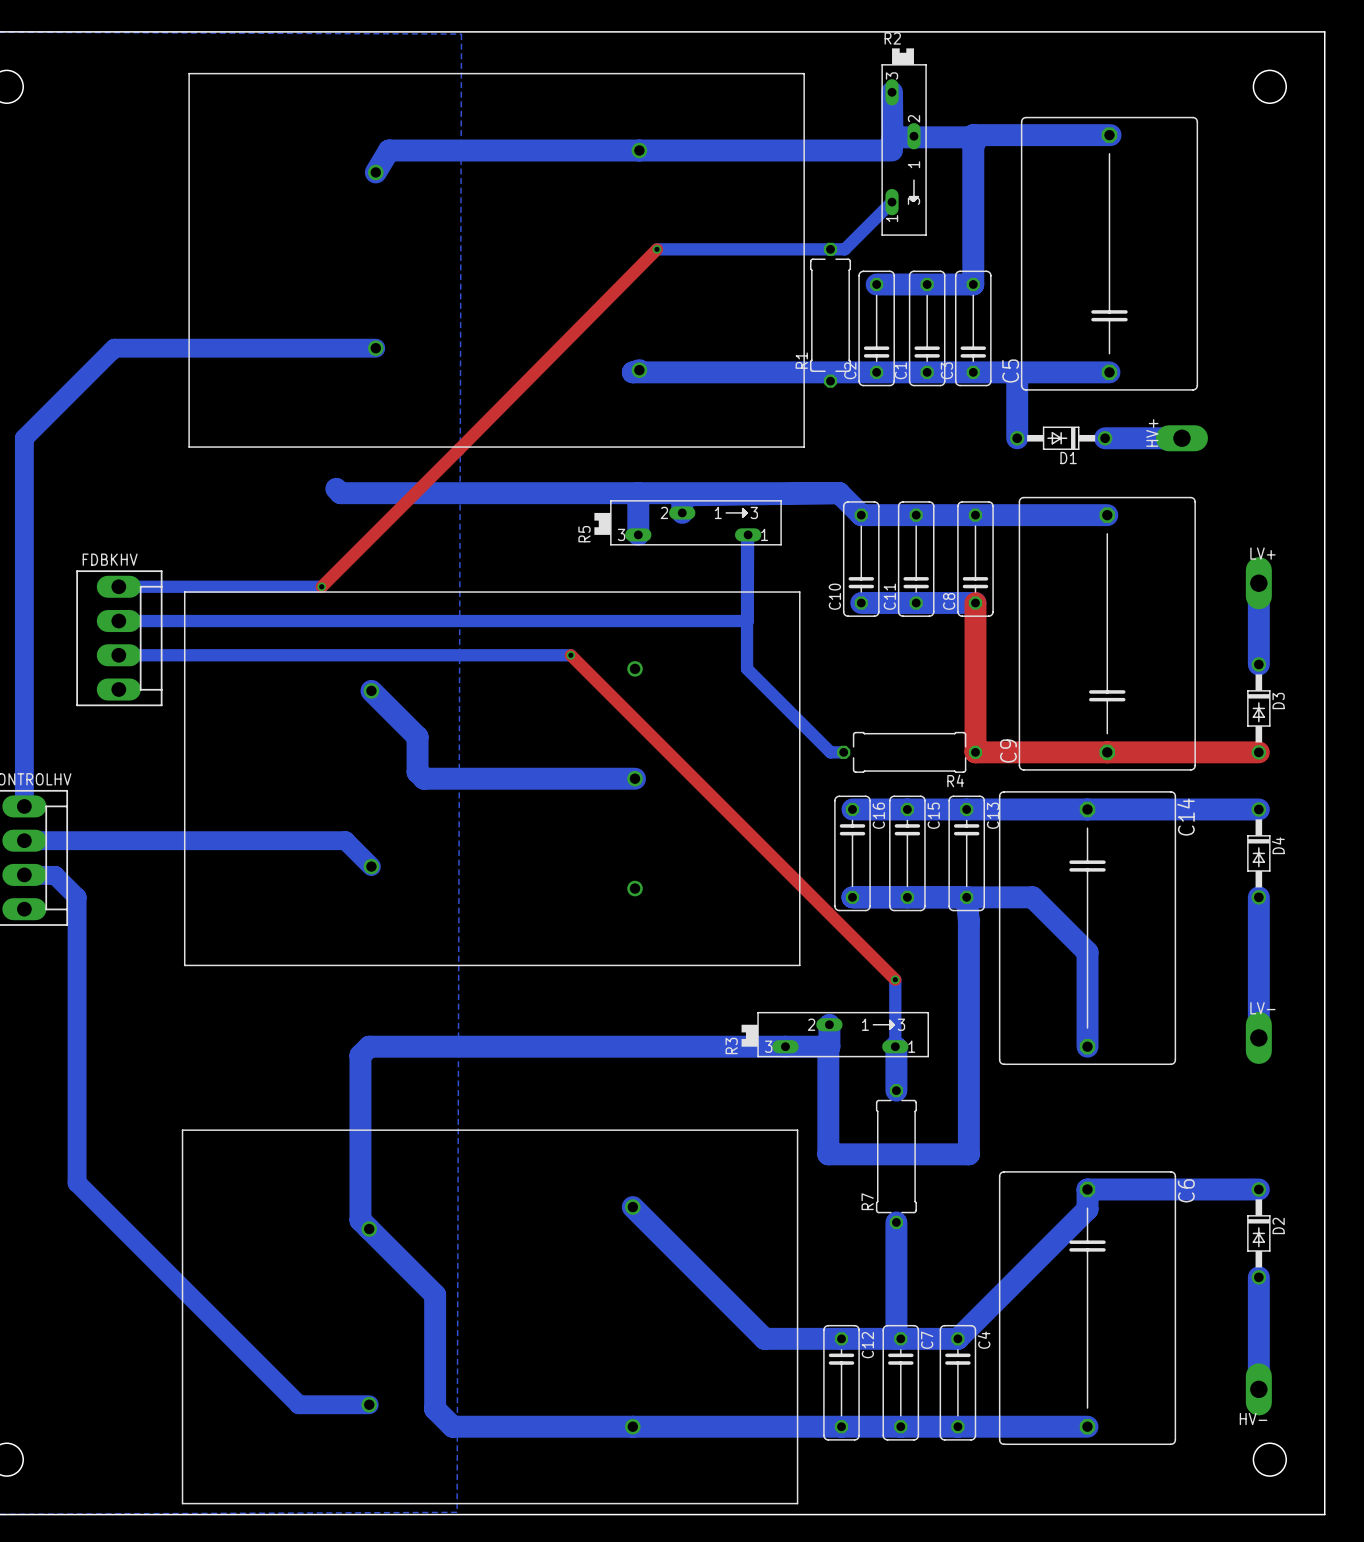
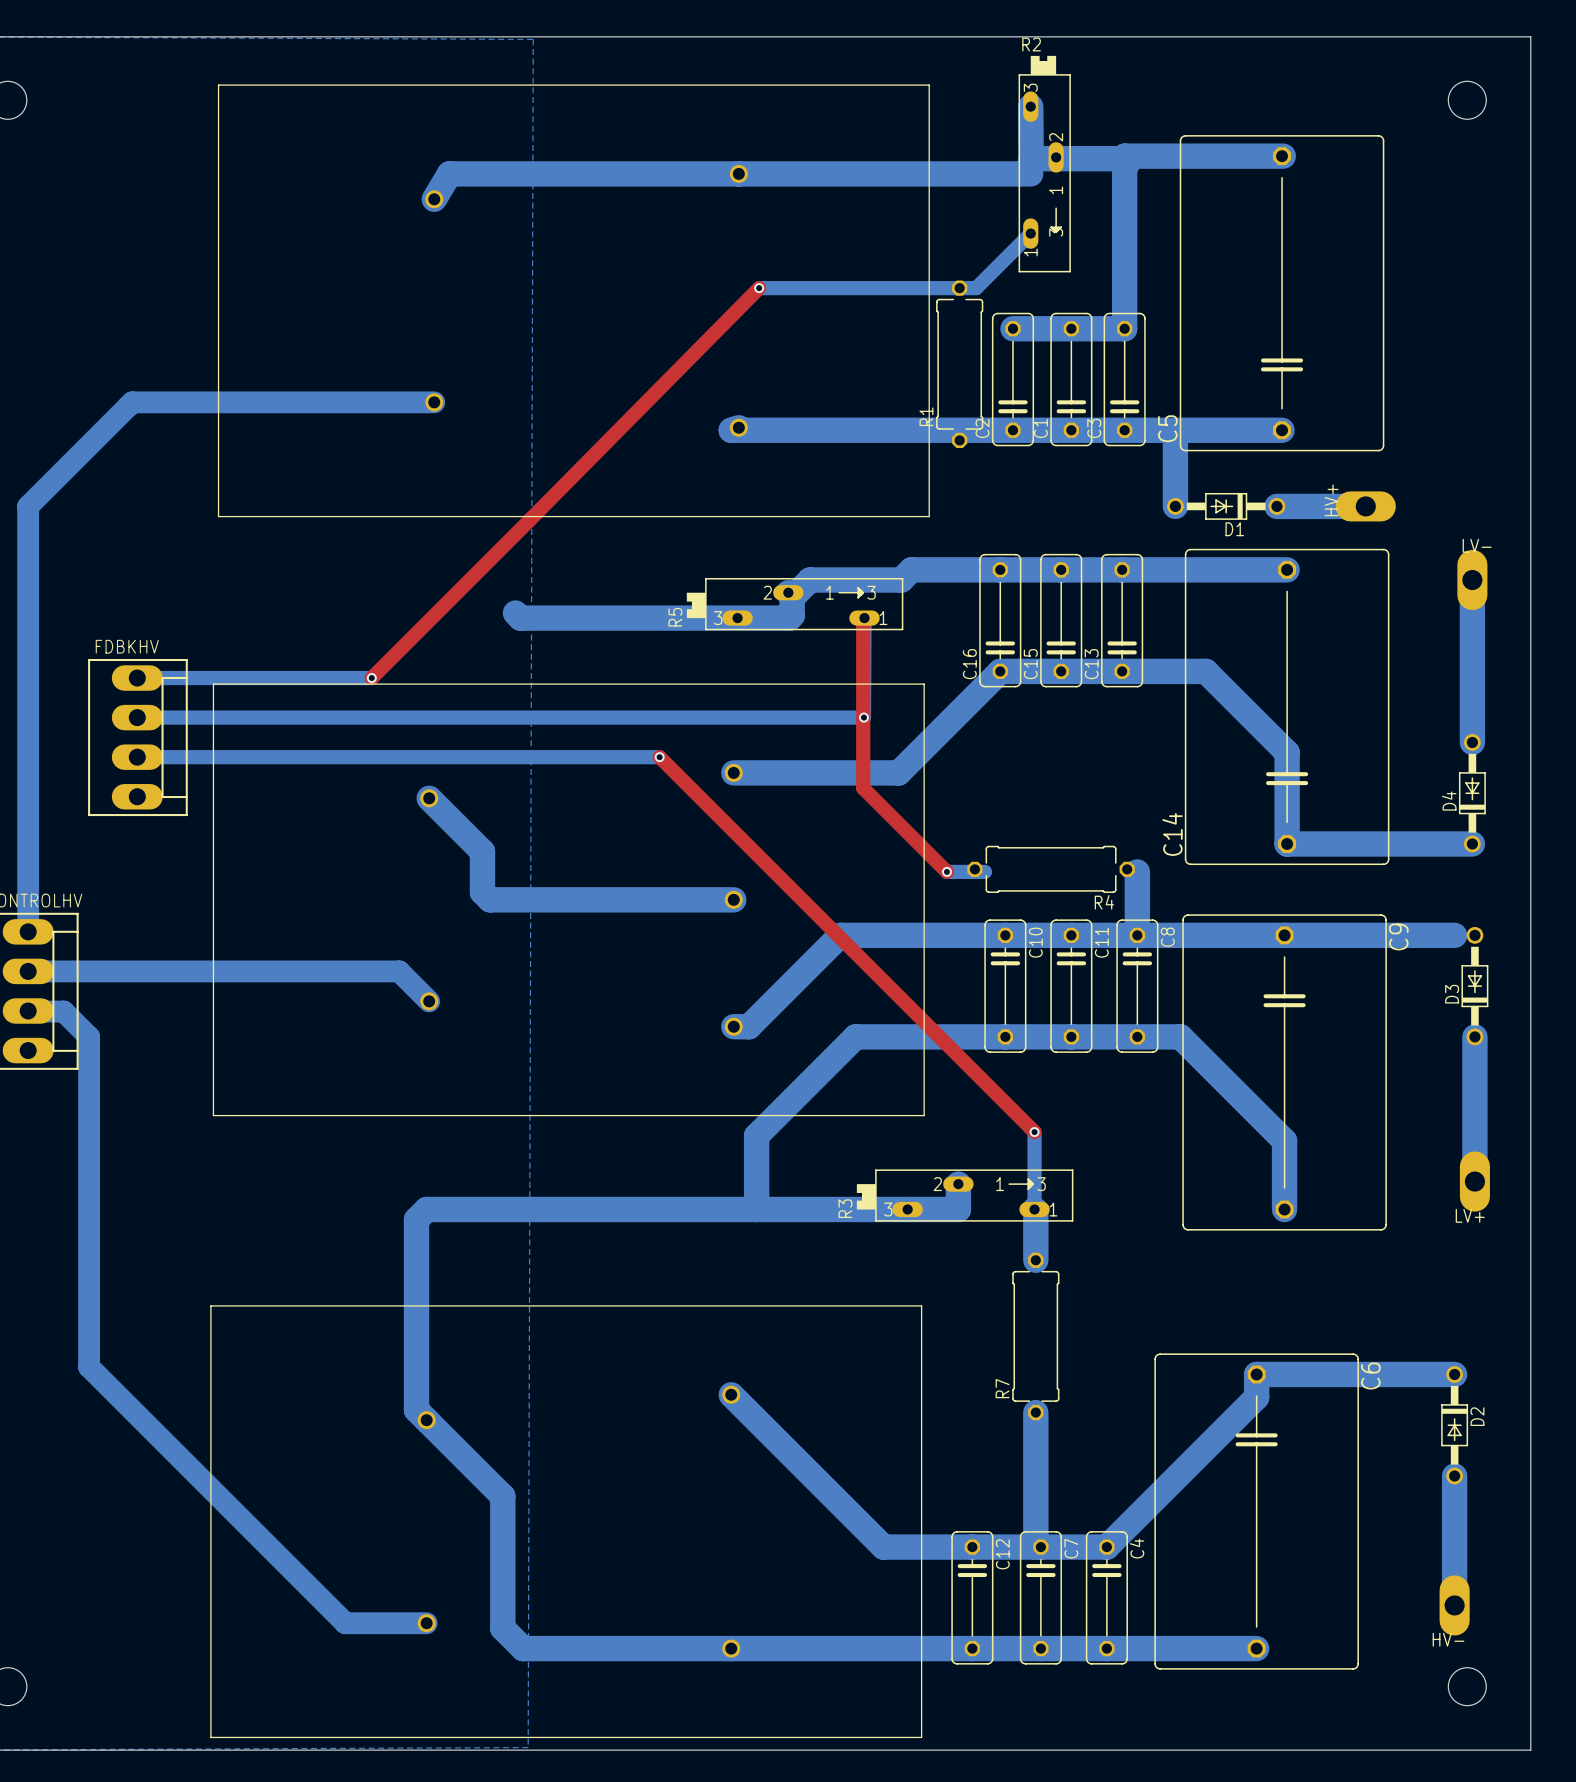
bottom track: (336, 488) (340, 493) (788, 493) -> (792, 597) (809, 580) (901, 580) (911, 569)
bottom track: (638, 493) (638, 534) -> none
bottom track: none -> (969, 569) (1287, 569)
bottom track: none -> (1472, 580) (1472, 742)
LV-: none -> (1472, 580)
bottom track: (682, 512) (682, 495) (839, 493) (861, 515) (1107, 515) -> (788, 592) (792, 596) (792, 615) (789, 618) (520, 618) (515, 613)
bottom track: (747, 536) (747, 668) (830, 752) (843, 752) -> none
top track: none -> (863, 619) (863, 788) (946, 871)
C10 rotation: 0° (861, 559) -> 180° (1005, 986)
C10 position: (861, 559) -> (1005, 986)
C11 rotation: 0° (916, 559) -> 180° (1071, 986)
C11 position: (916, 559) -> (1071, 986)
C8 rotation: 0° (975, 559) -> 180° (1137, 986)
C8 position: (975, 559) -> (1137, 986)
bottom track: (1258, 583) (1258, 664) -> none
LV+: (1258, 583) -> none
bottom track: (861, 603) (975, 603) -> none
top track: (975, 603) (975, 752) (1258, 752) -> none
via: none -> (863, 717)
C9 rotation: 0° (1107, 633) -> 180° (1284, 1072)
C9 position: (1107, 633) -> (1284, 1072)
bottom track: none -> (733, 772) (898, 772) (1000, 671) (1205, 671) (1287, 752) (1287, 843) (1472, 843)
D3 rotation: 0° (1258, 708) -> 180° (1474, 986)
D3 position: (1258, 708) -> (1474, 986)
bottom track: none -> (946, 871) (985, 871)
via: none -> (946, 871)
bottom track: none -> (1137, 871) (1137, 935)
bottom track: none -> (985, 935) (840, 935) (749, 1026) (733, 1026)
C16 rotation: 0° (852, 853) -> 180° (1000, 620)
C16 position: (852, 853) -> (1000, 620)
C15 rotation: 0° (907, 853) -> 180° (1061, 620)
C15 position: (907, 853) -> (1061, 620)
C13 rotation: 0° (966, 853) -> 180° (1122, 620)
C13 position: (966, 853) -> (1122, 620)
D4 rotation: 0° (1258, 853) -> 180° (1472, 793)
D4 position: (1258, 853) -> (1472, 793)
bottom track: none -> (985, 1036) (855, 1036) (756, 1135) (756, 1209)
bottom track: (966, 897) (968, 921) (968, 1154) (828, 1154) (828, 1046) -> none
bottom track: (1021, 897) (1032, 897) (1087, 952) (1087, 1046) -> (1180, 1036) (1284, 1140) (1284, 1209)
bottom track: (1258, 897) (1258, 1037) -> none
bottom track: none -> (1474, 1036) (1474, 1181)
C14 rotation: 0° (1087, 928) -> 180° (1287, 706)
C14 position: (1087, 928) -> (1287, 706)
LV+: none -> (1474, 1181)
LV-: (1258, 1037) -> none

